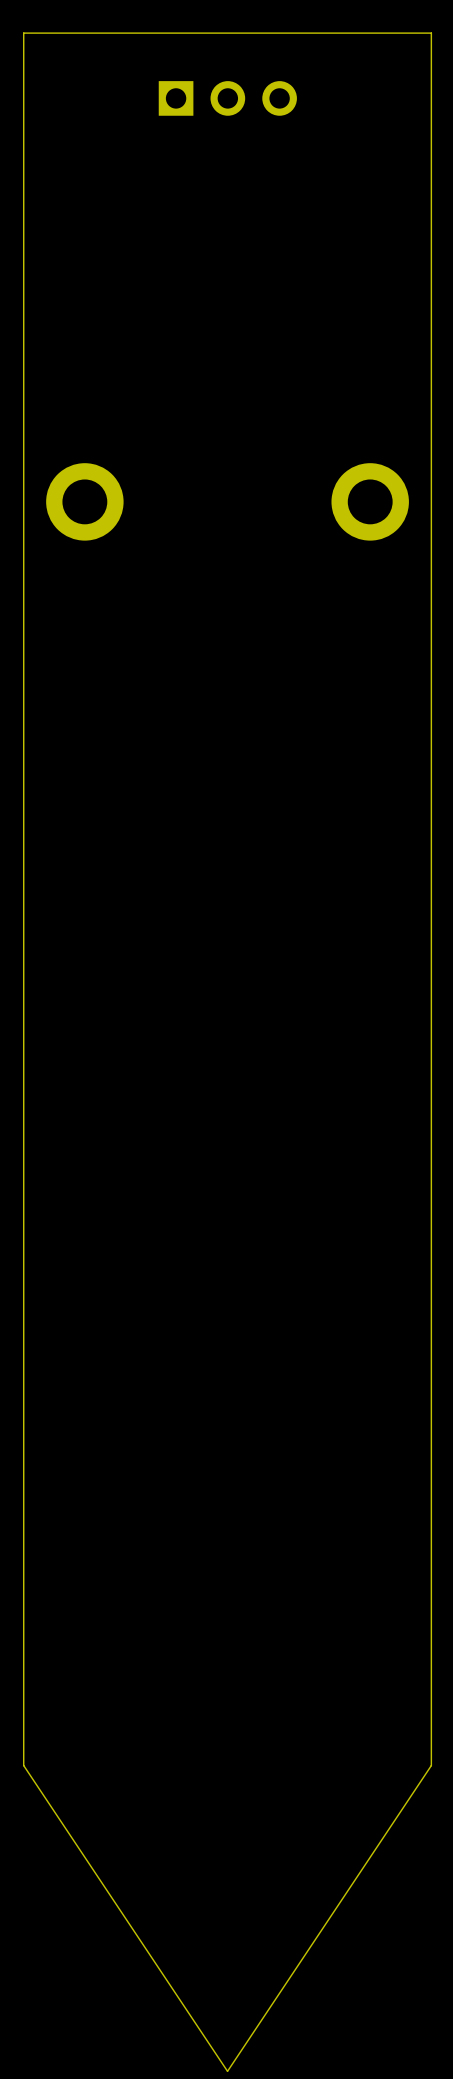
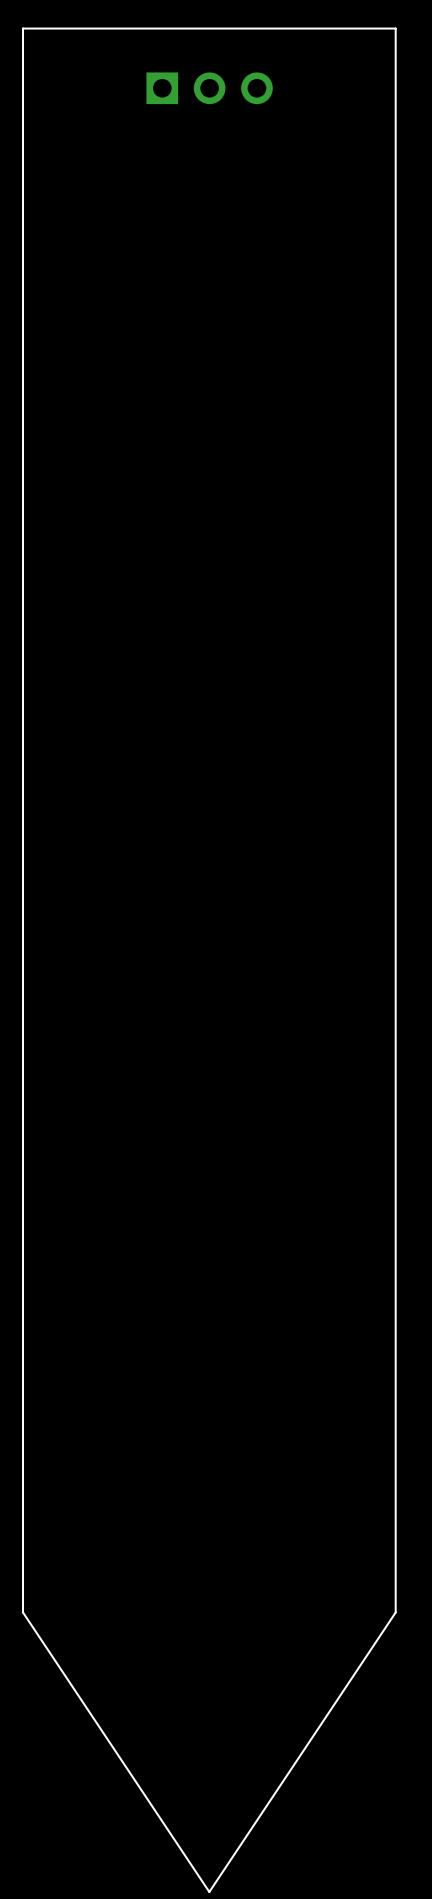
part: (84, 501) -> none
part: (370, 501) -> none

